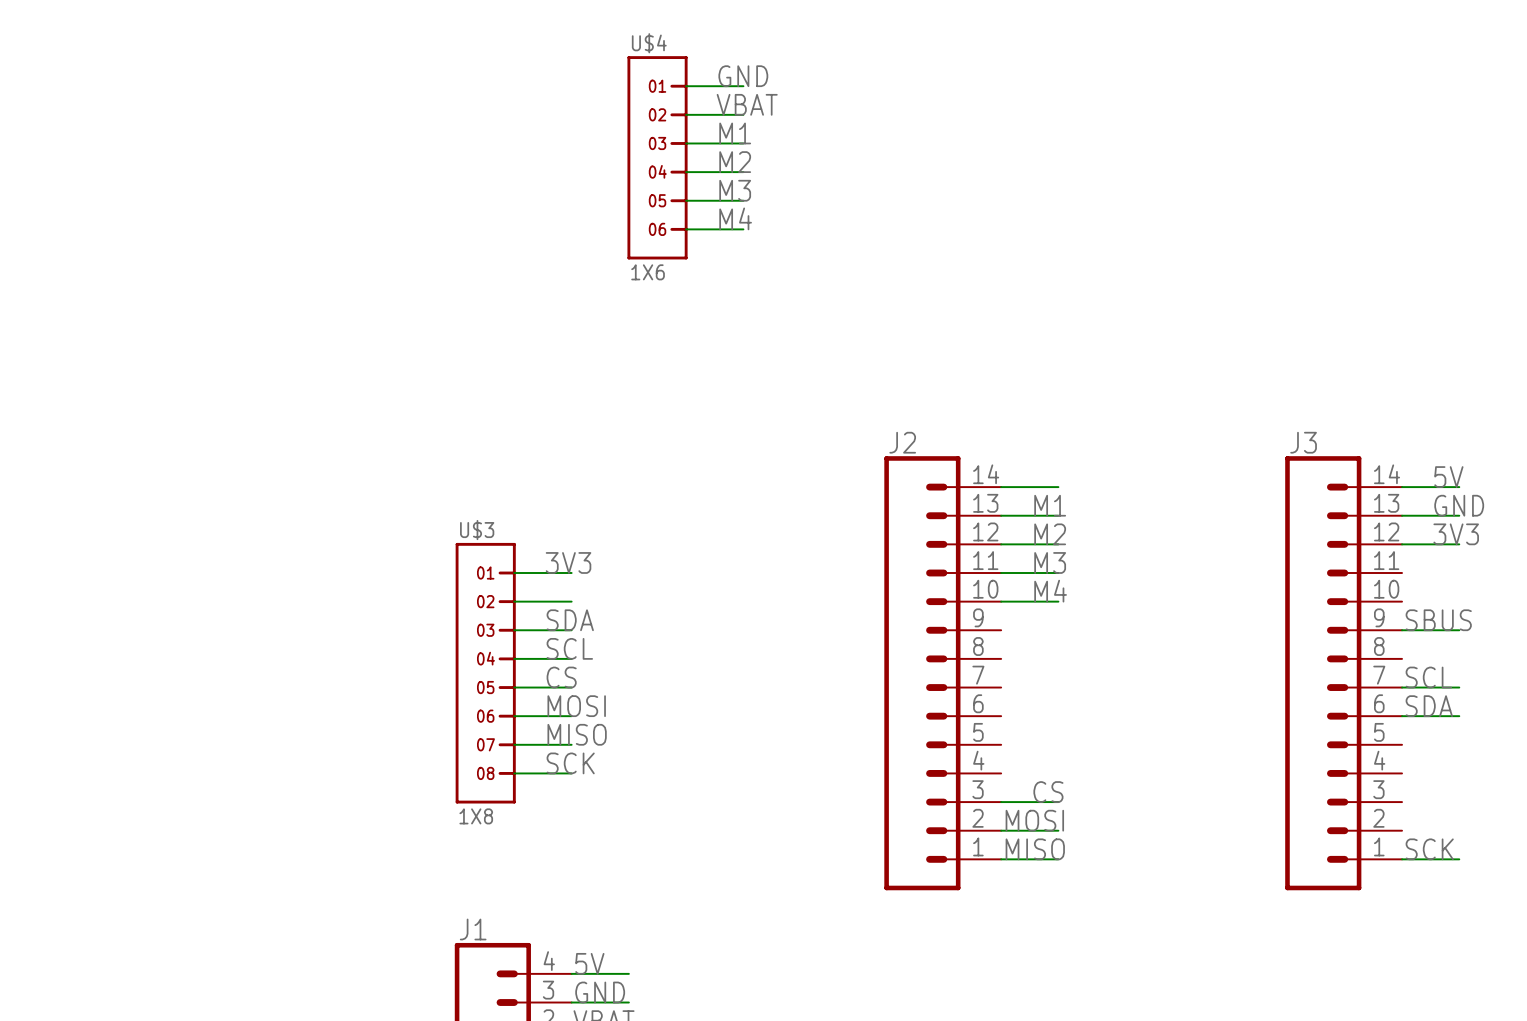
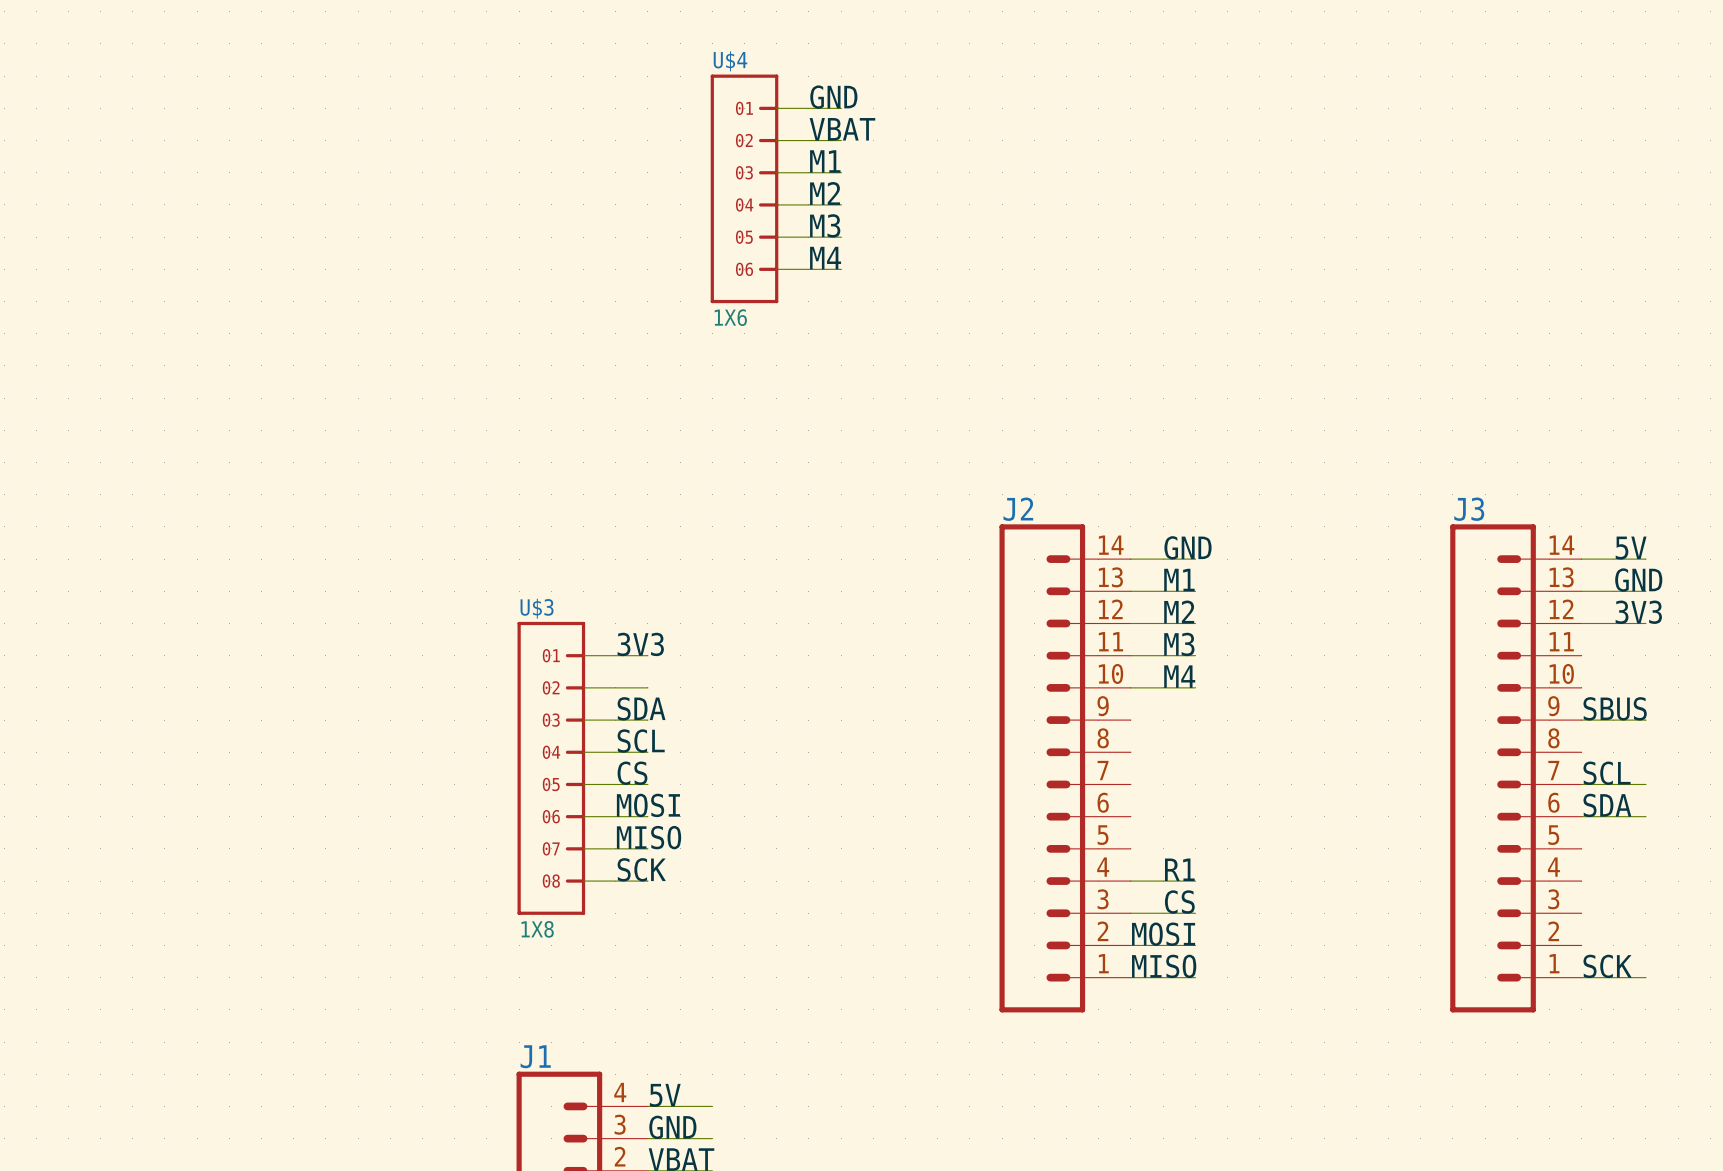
label: none -> GND (1188, 547)
label: none -> R1 (1179, 869)
wire: none -> (1130, 881) (1195, 881)

